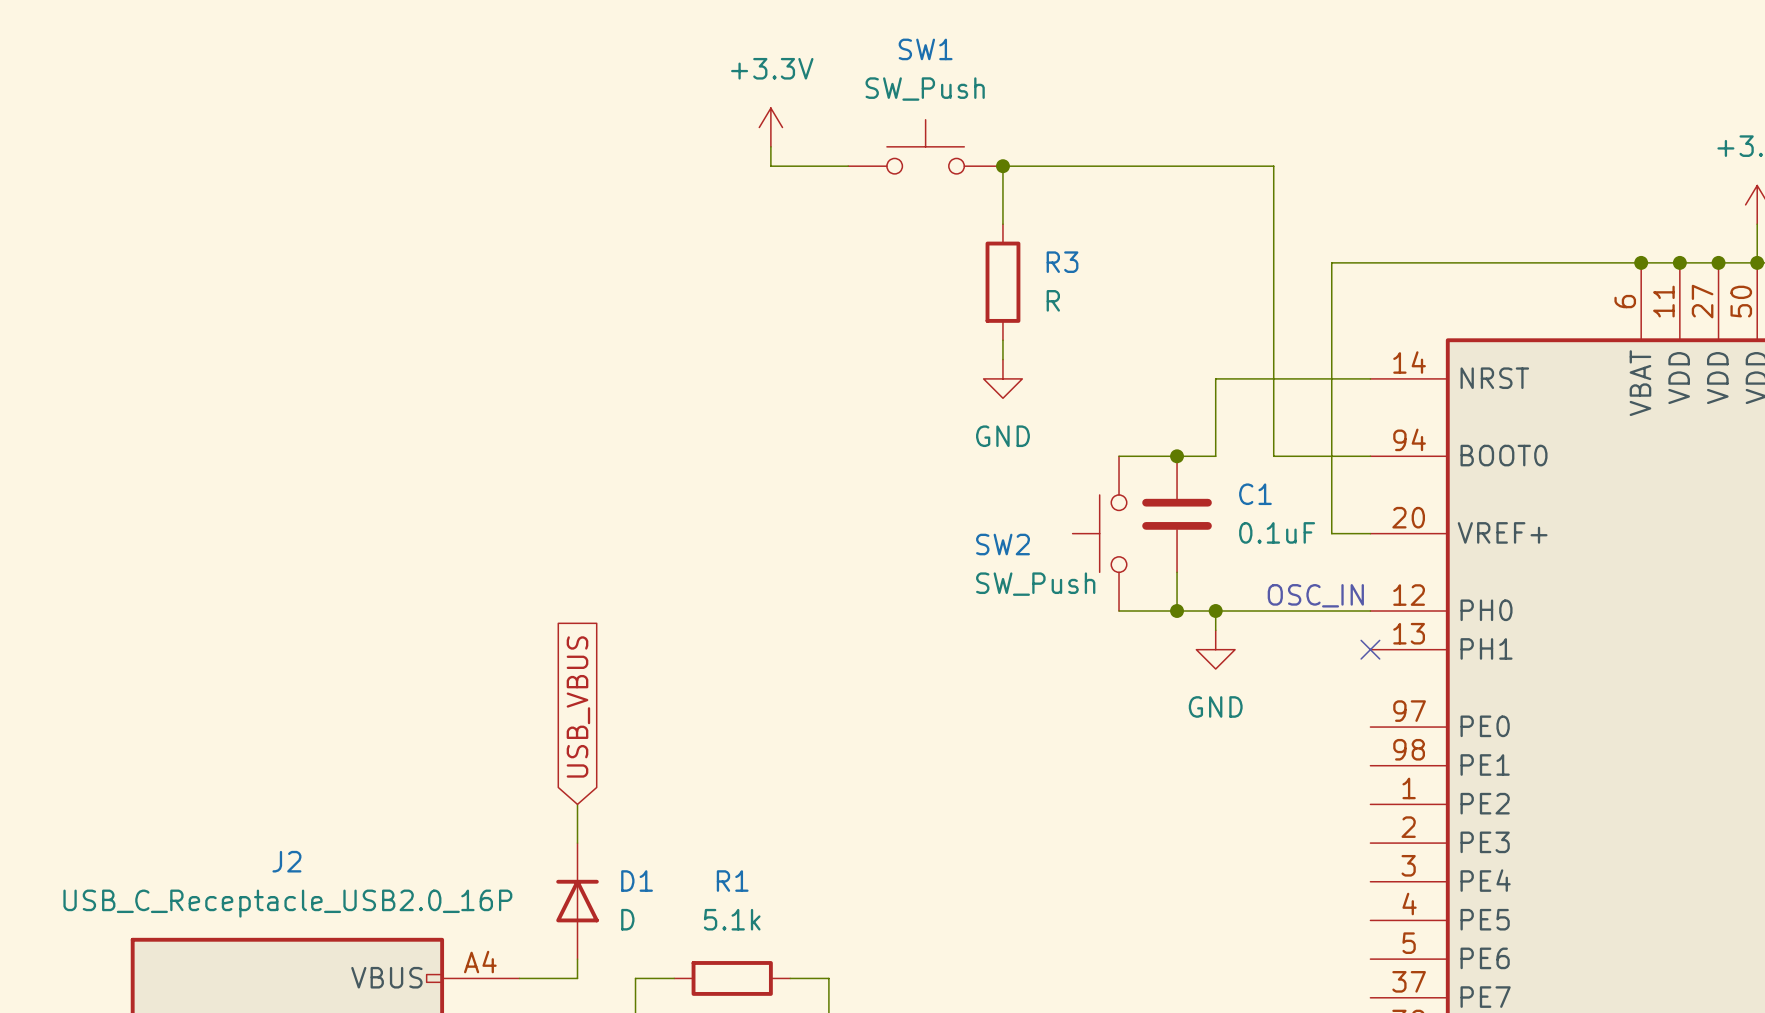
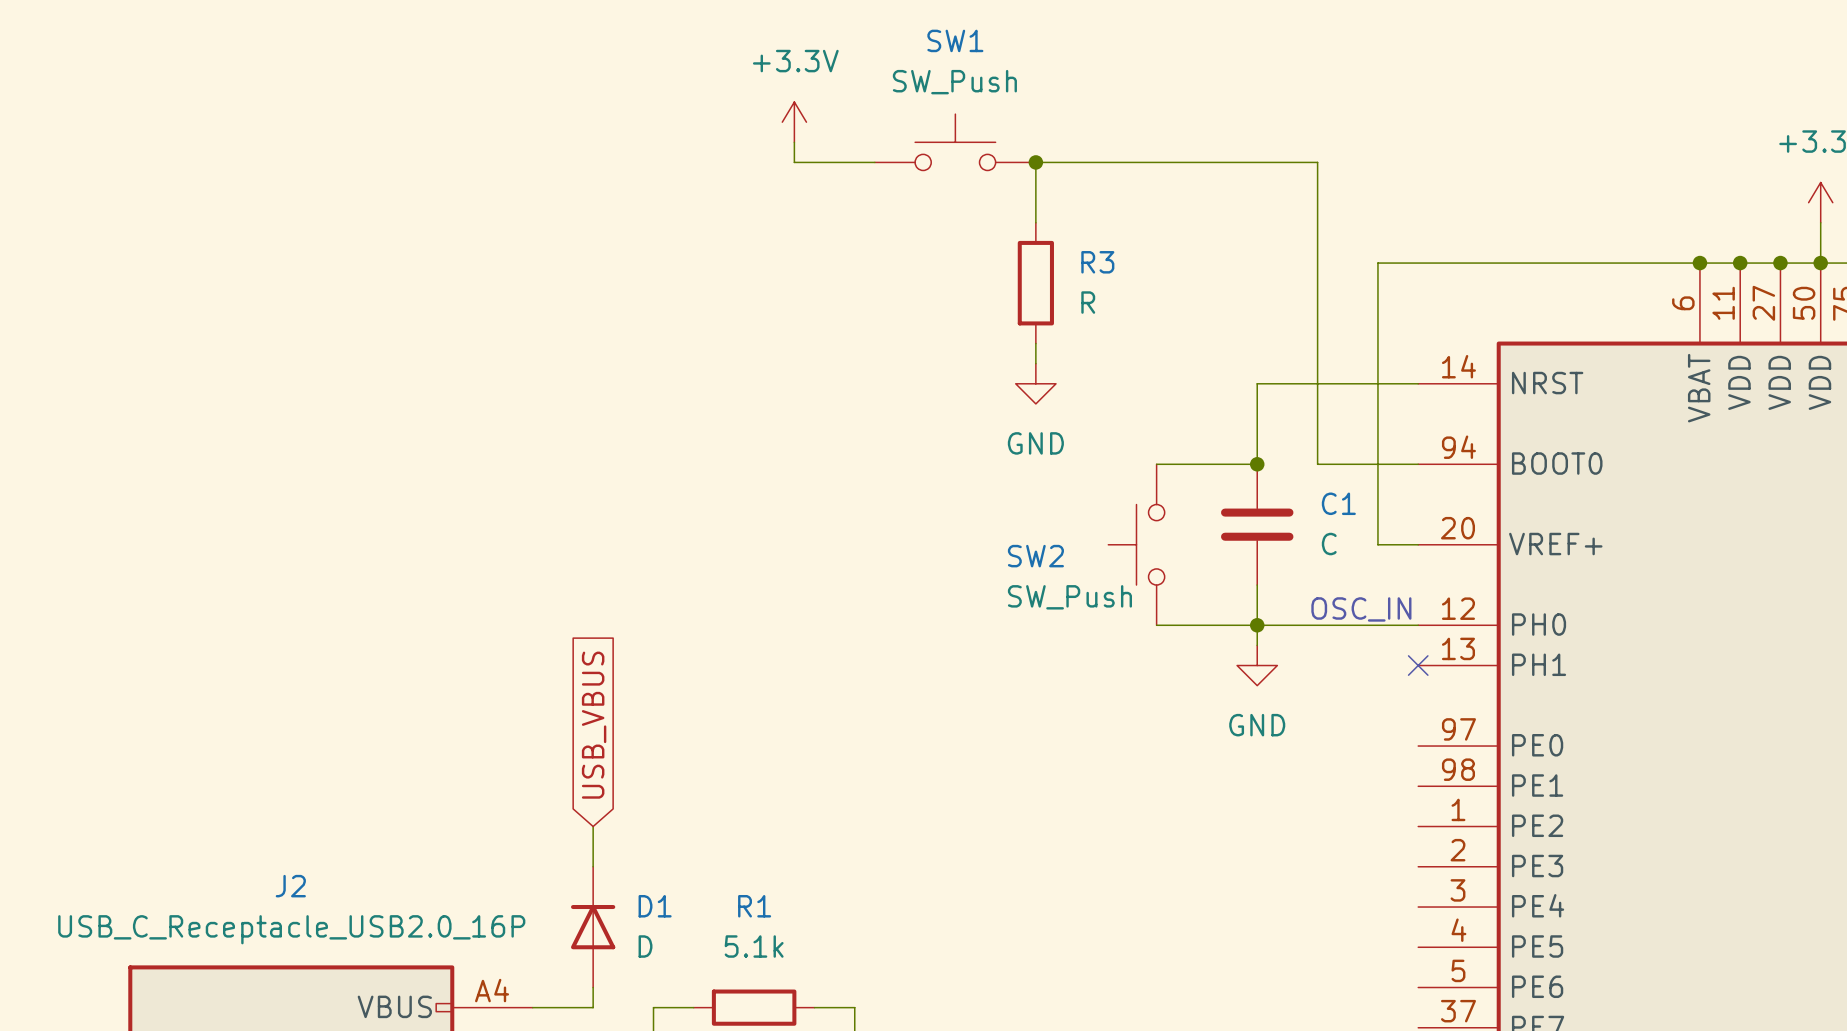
junction position: (1177, 456) -> (1257, 464)
C1 position: (1177, 514) -> (1257, 524)
C1 value: 0.1uF (1277, 532) -> C (1329, 544)
wire: (1177, 572) (1177, 611) -> (1257, 585) (1257, 625)
junction: (1177, 611) -> none

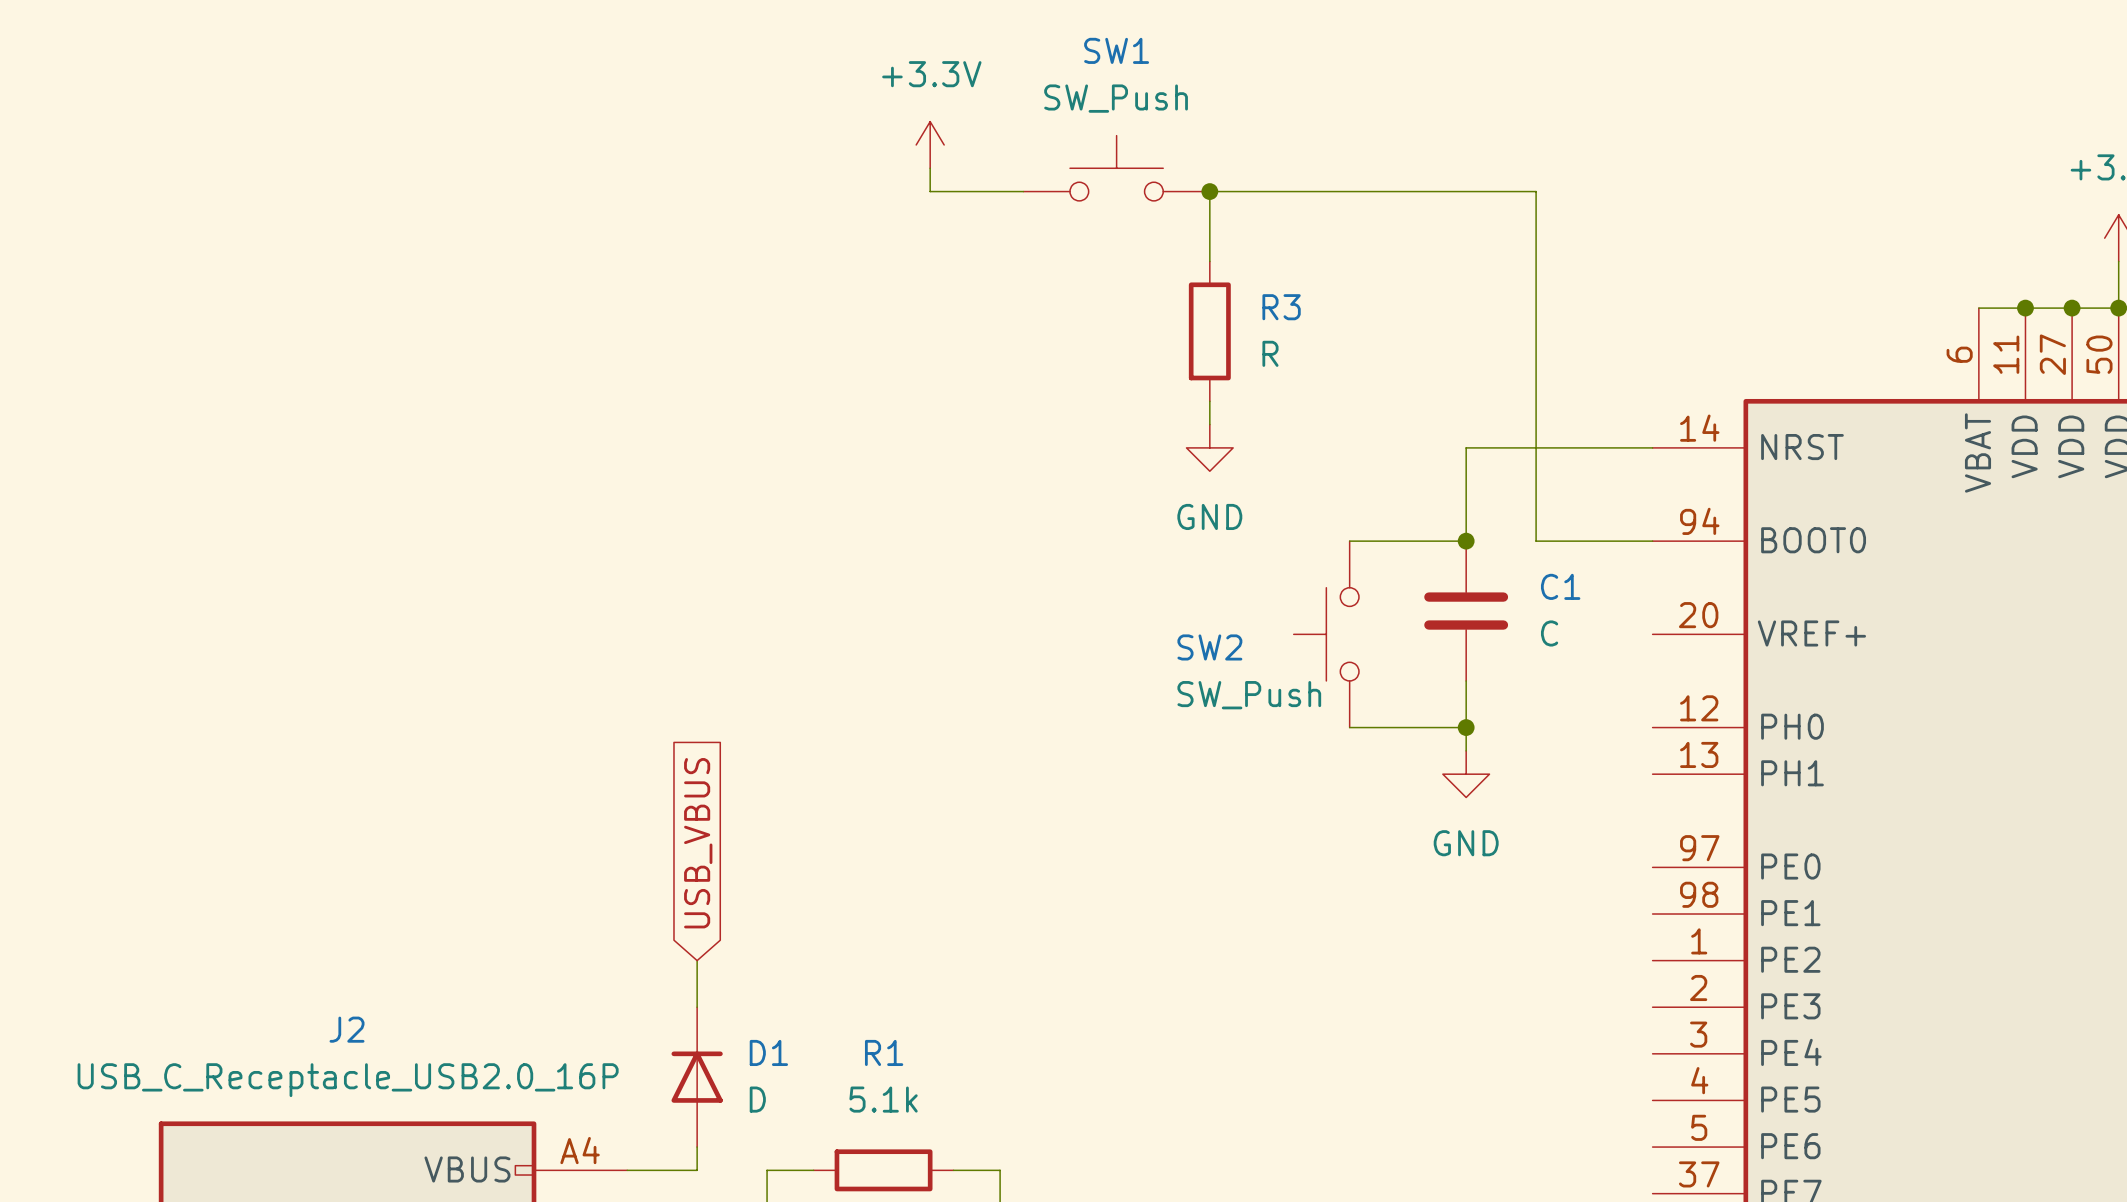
wire: (1699, 263) (1377, 263) (1377, 544) (1418, 544) -> none
junction: (1699, 263) -> none
text: OSC_IN (1361, 609) -> none
wire: (1257, 625) (1418, 625) -> none
no-connect mark: (1418, 665) -> none

